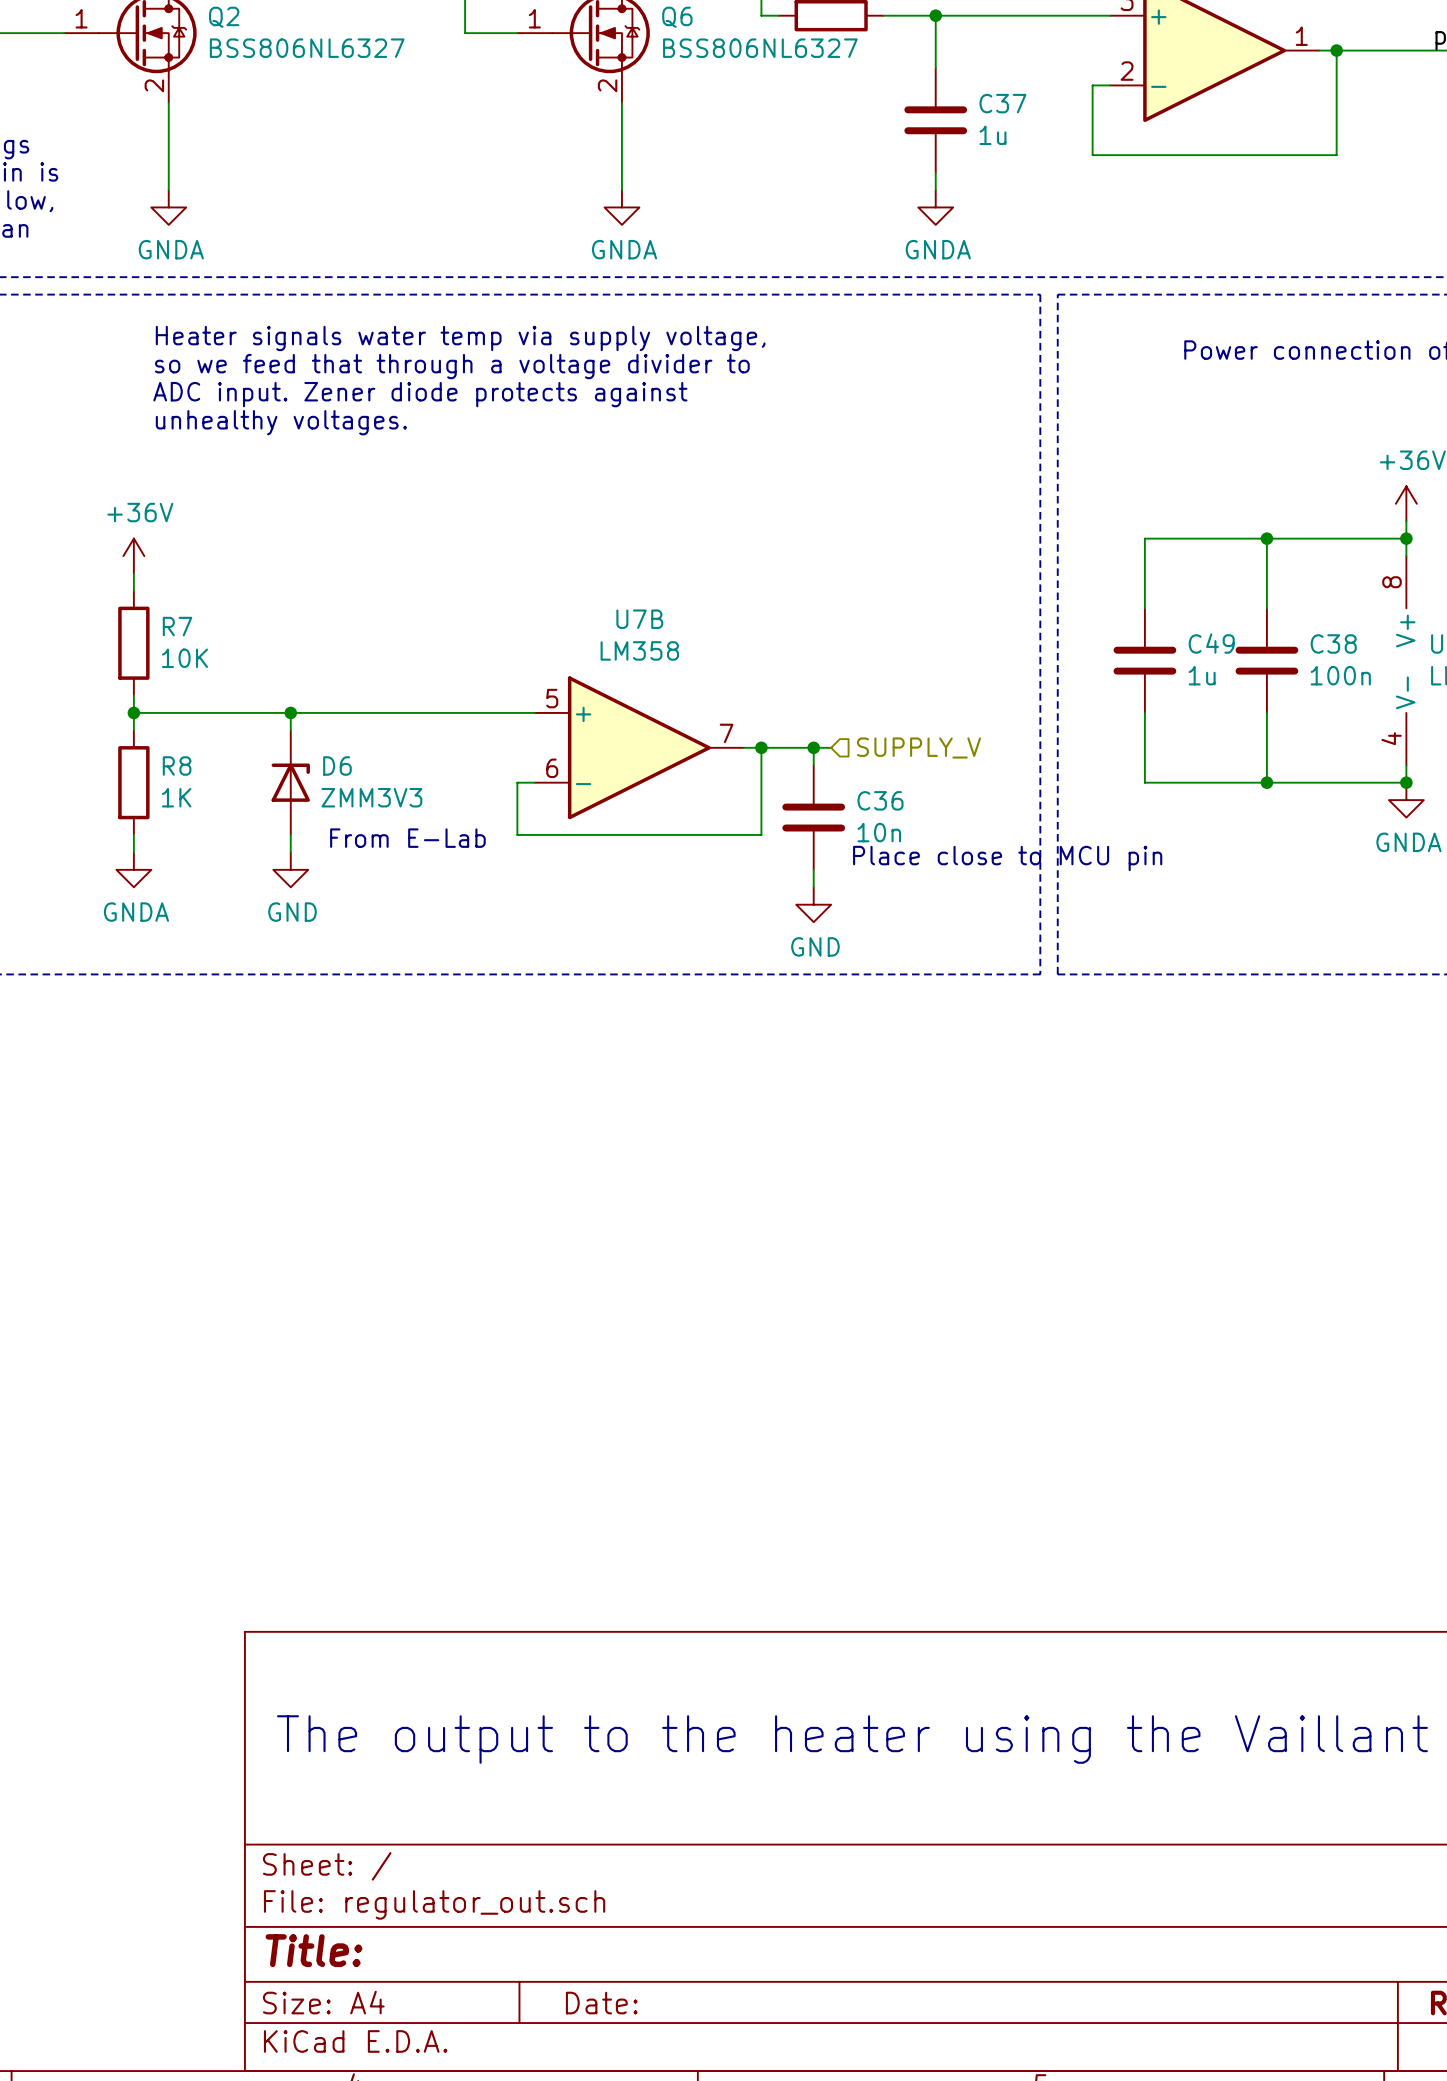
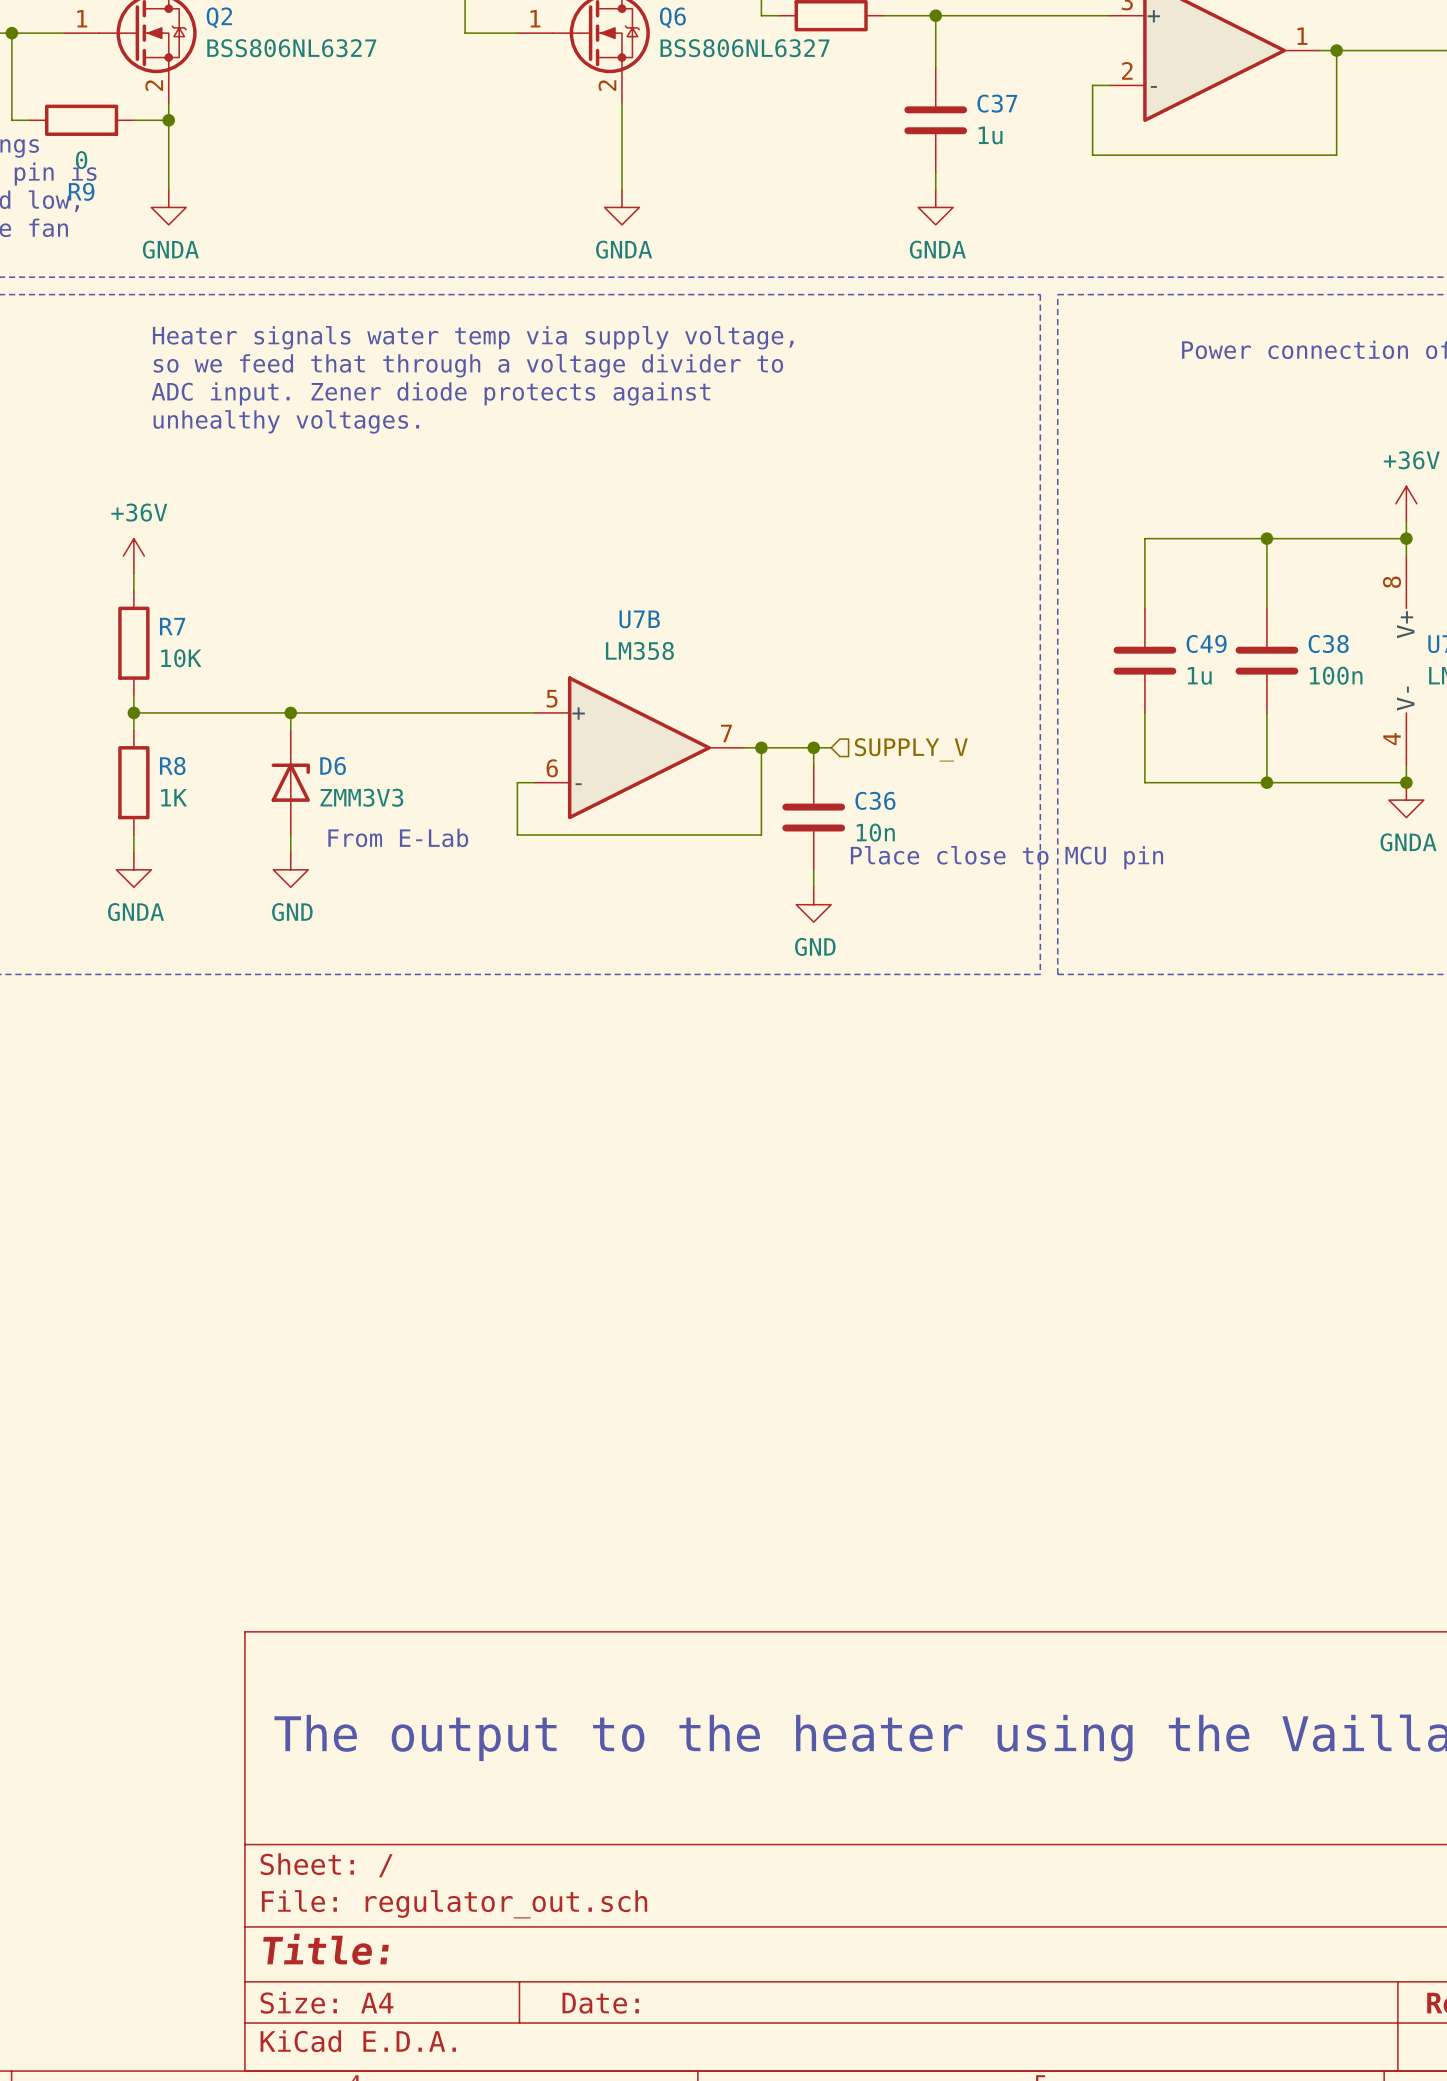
wire: none -> (11, 33) (11, 120) (29, 120)
junction: none -> (11, 33)
R9: none -> 0 (81, 120)
wire: none -> (133, 120) (168, 120)
junction: none -> (168, 120)

